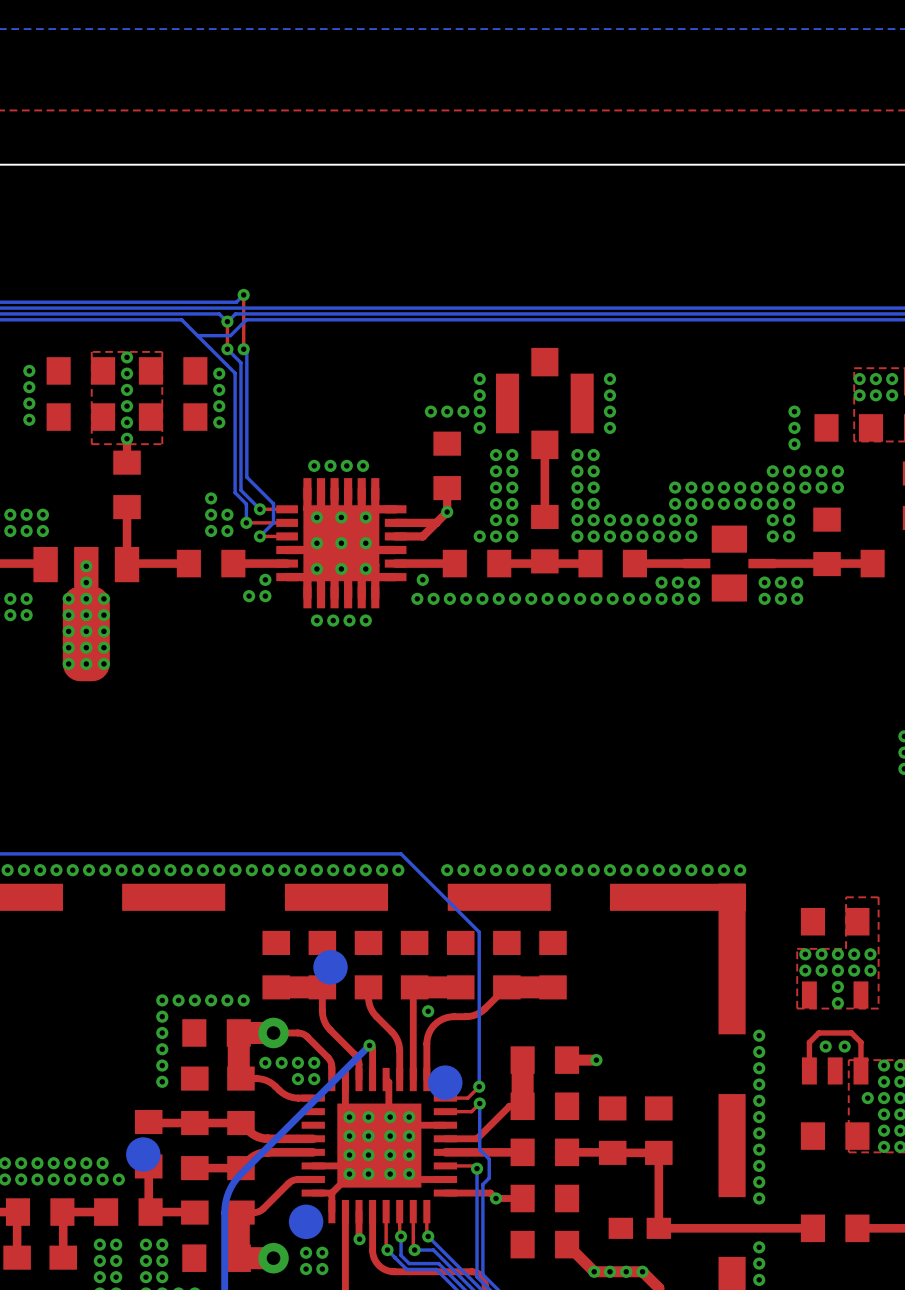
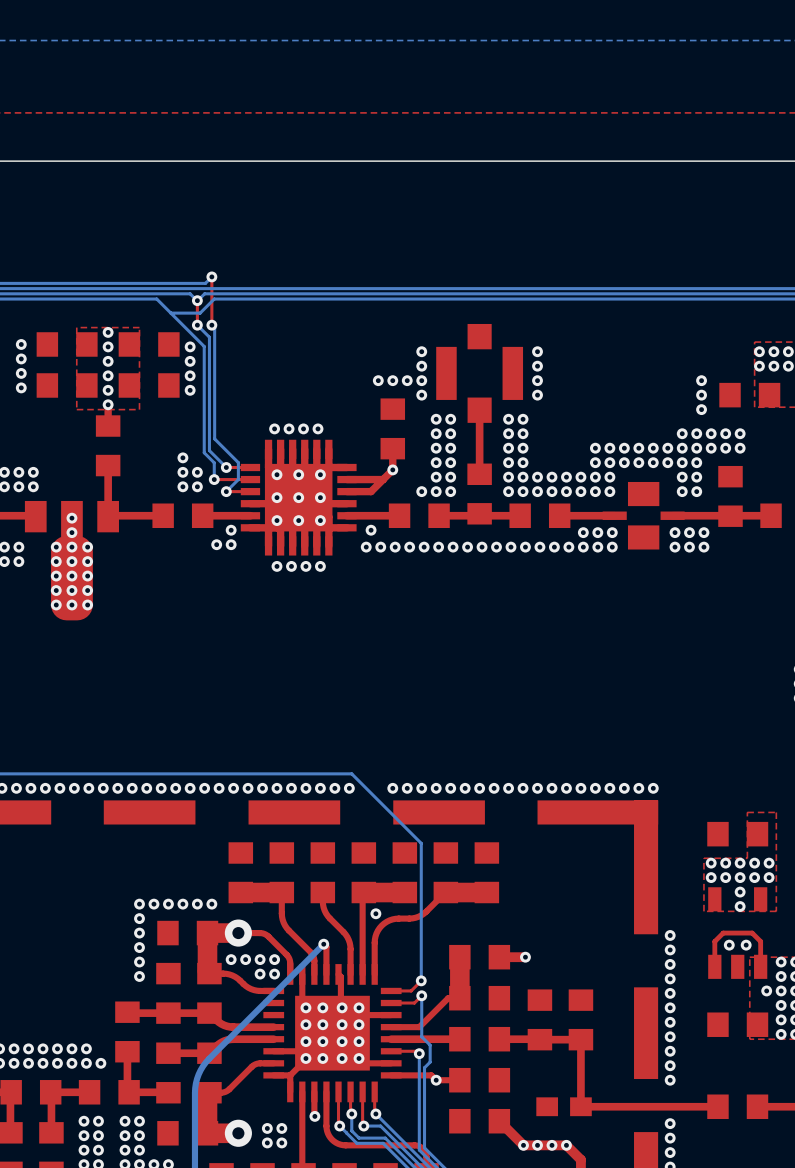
part: (330, 967) -> none
part: (445, 1082) -> none
part: (143, 1154) -> none
part: (306, 1221) -> none

